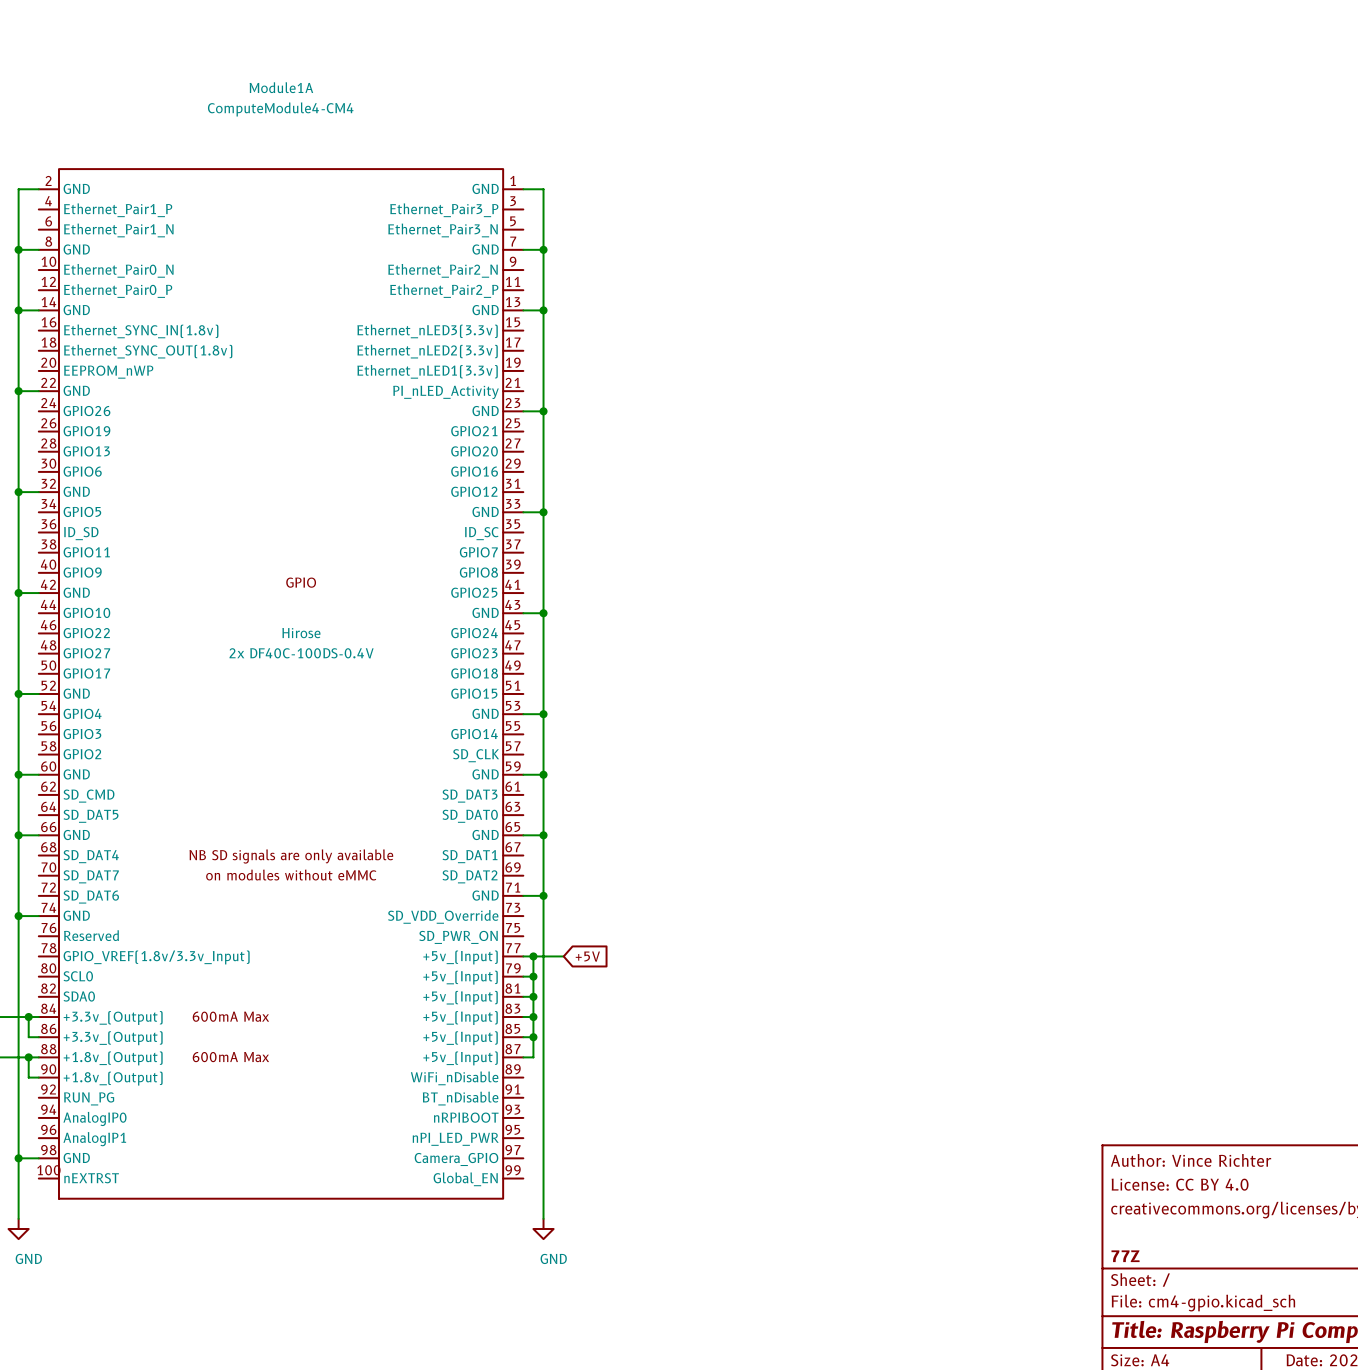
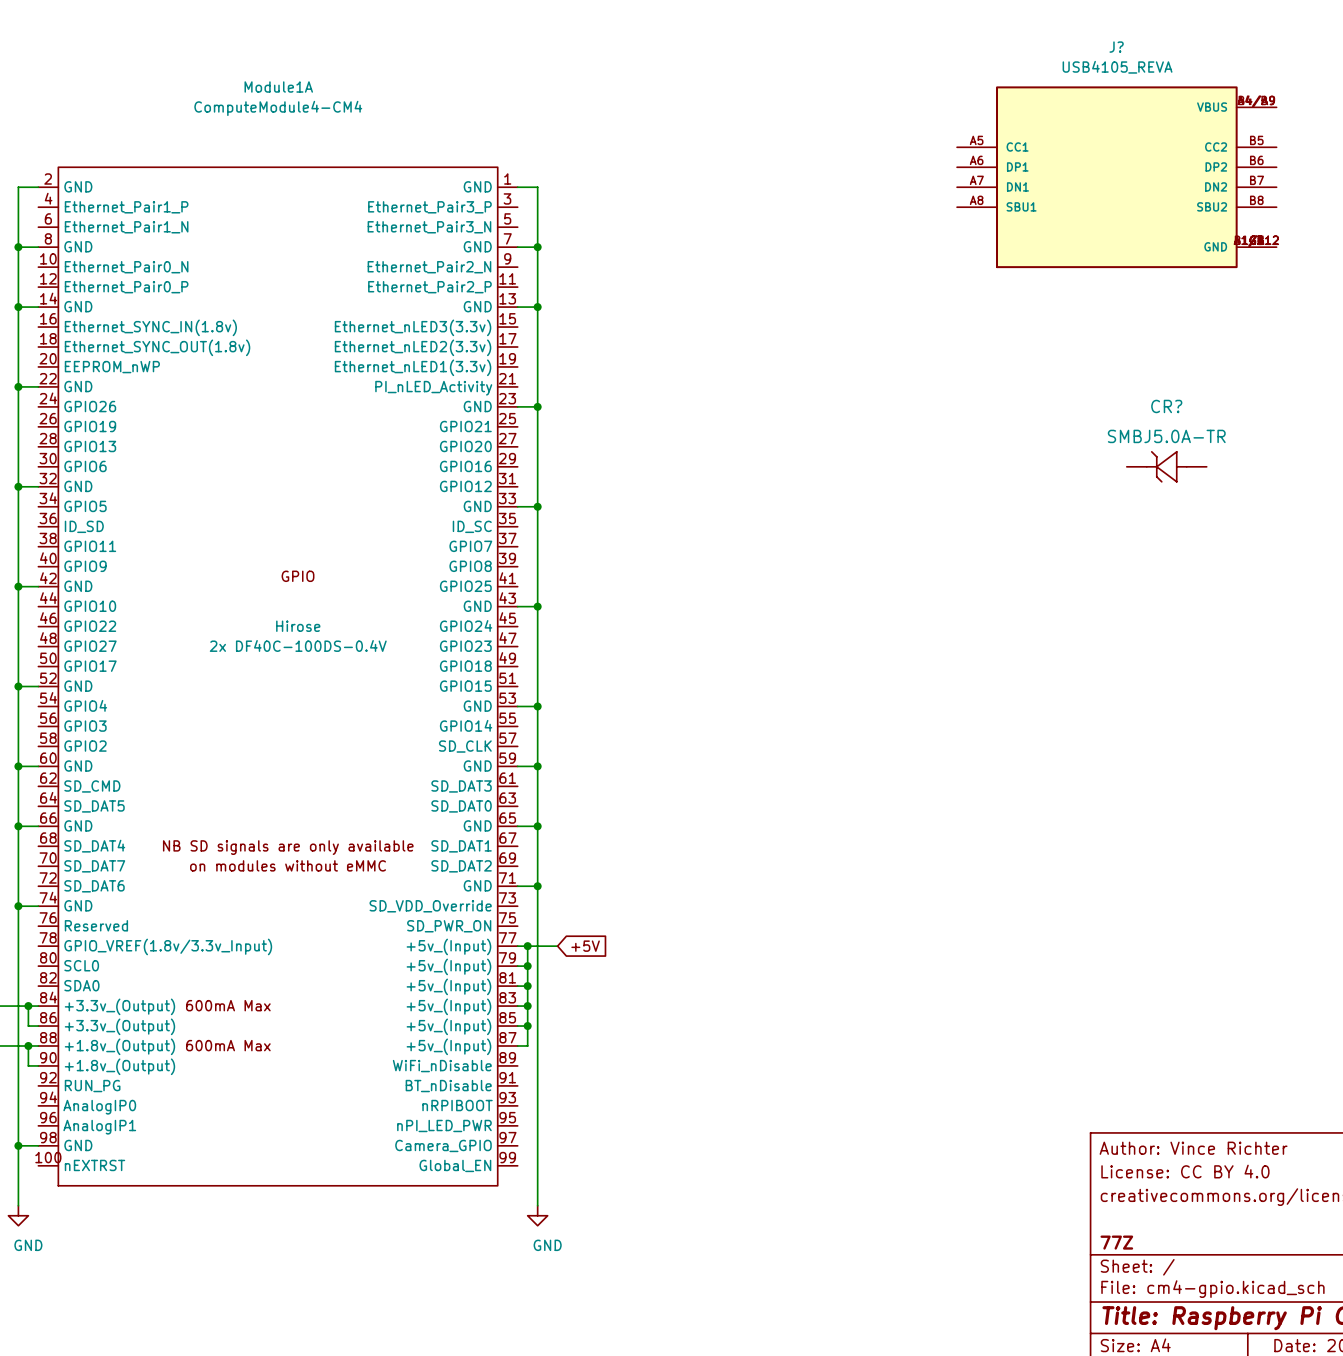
J?: none -> USB4105_REVA (1116, 177)
CR?: none -> SMBJ5.0A-TR (1166, 466)

